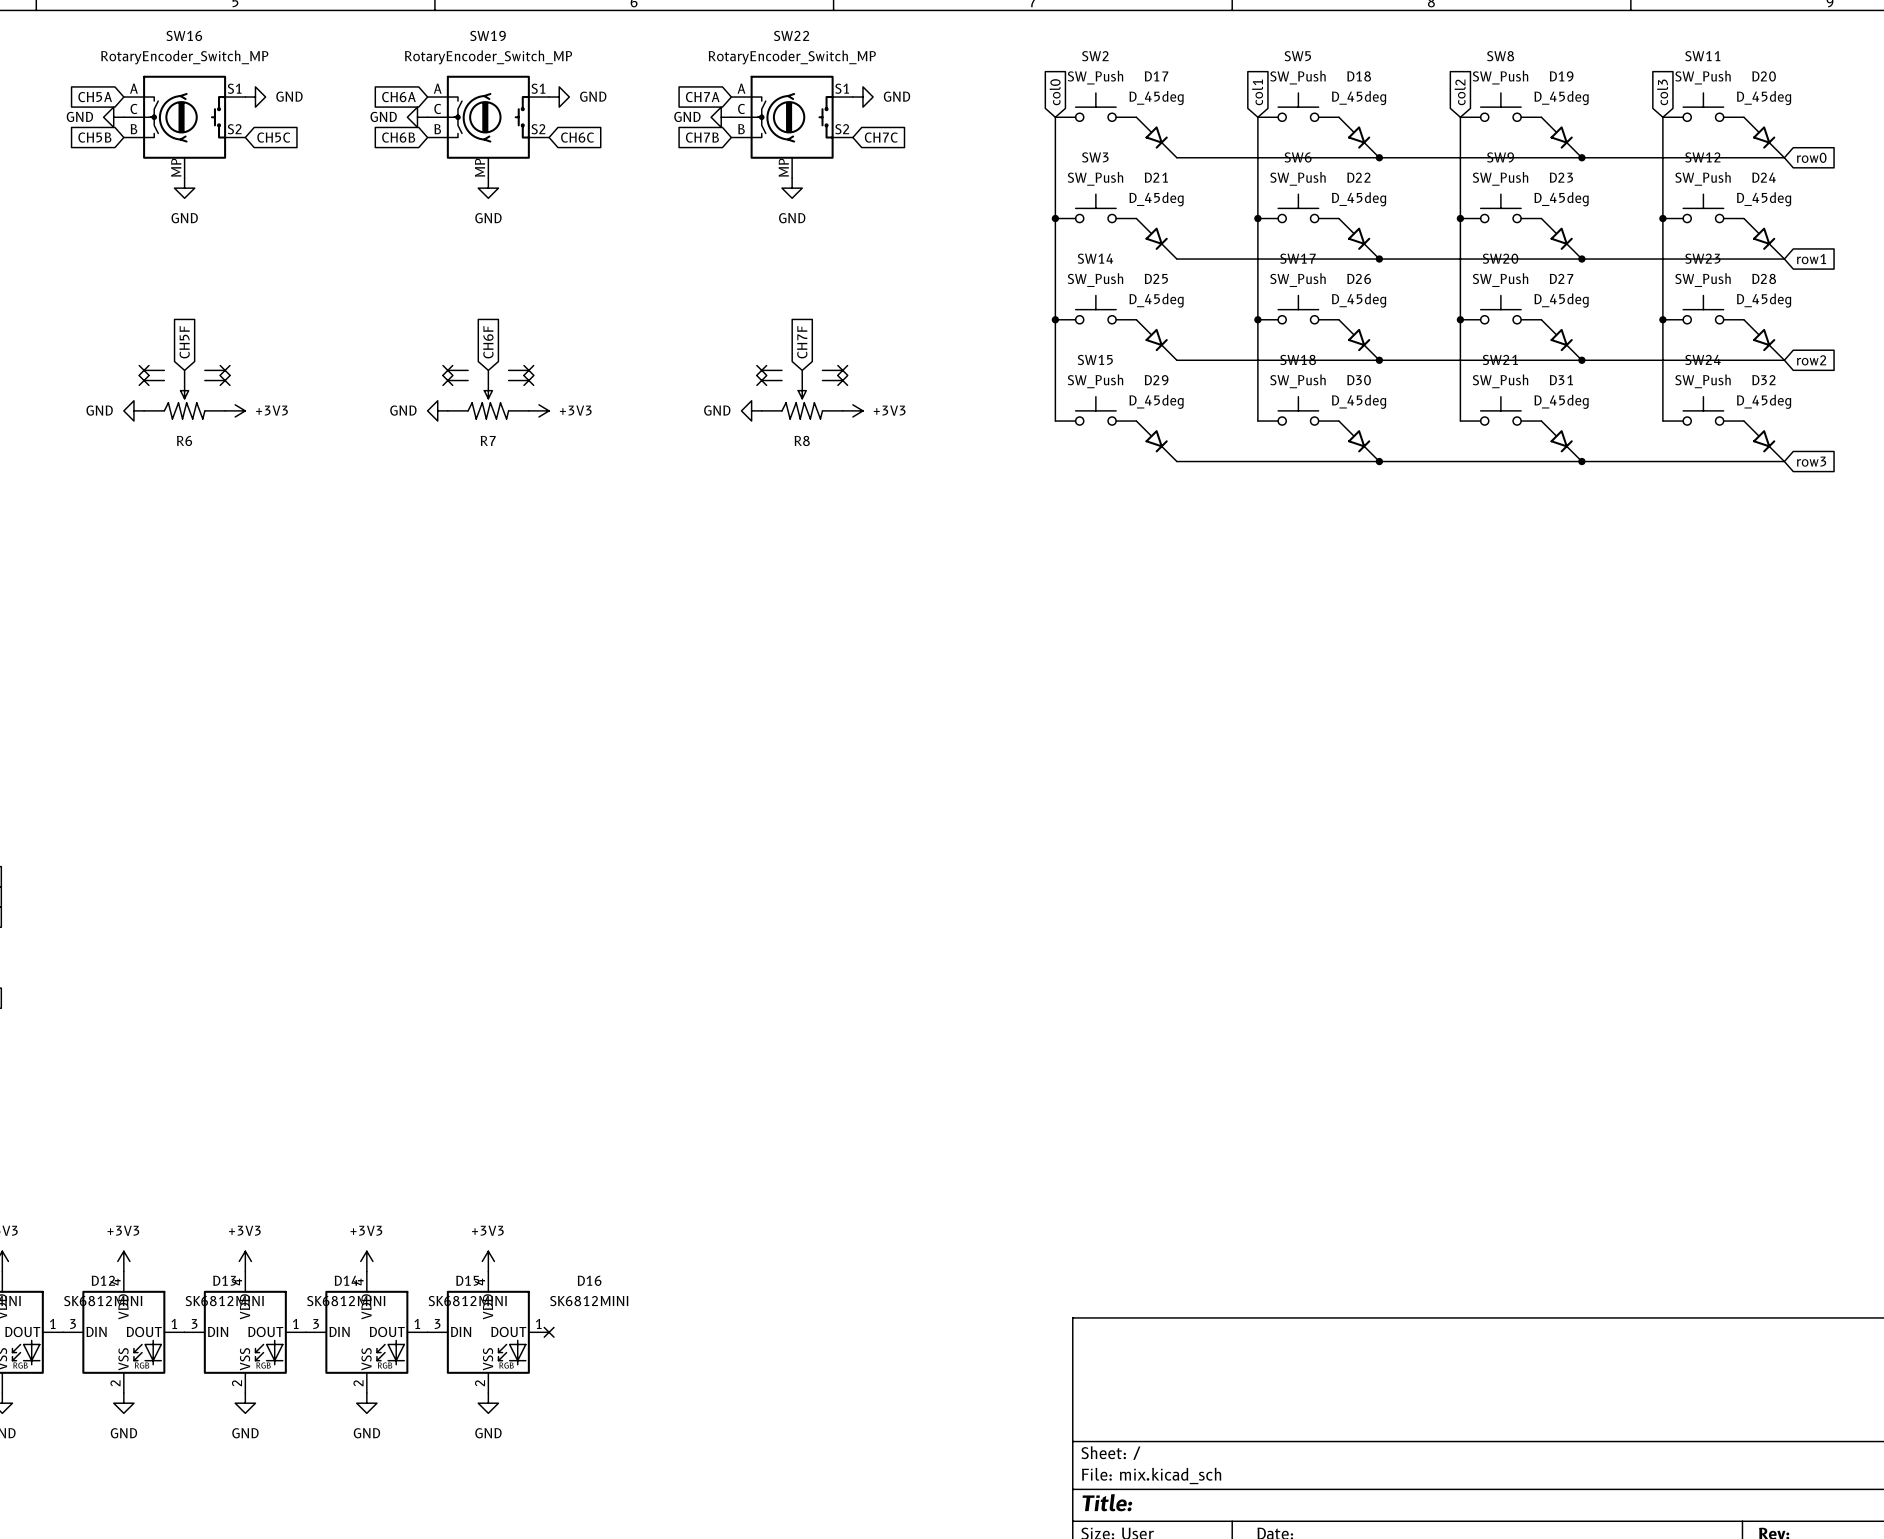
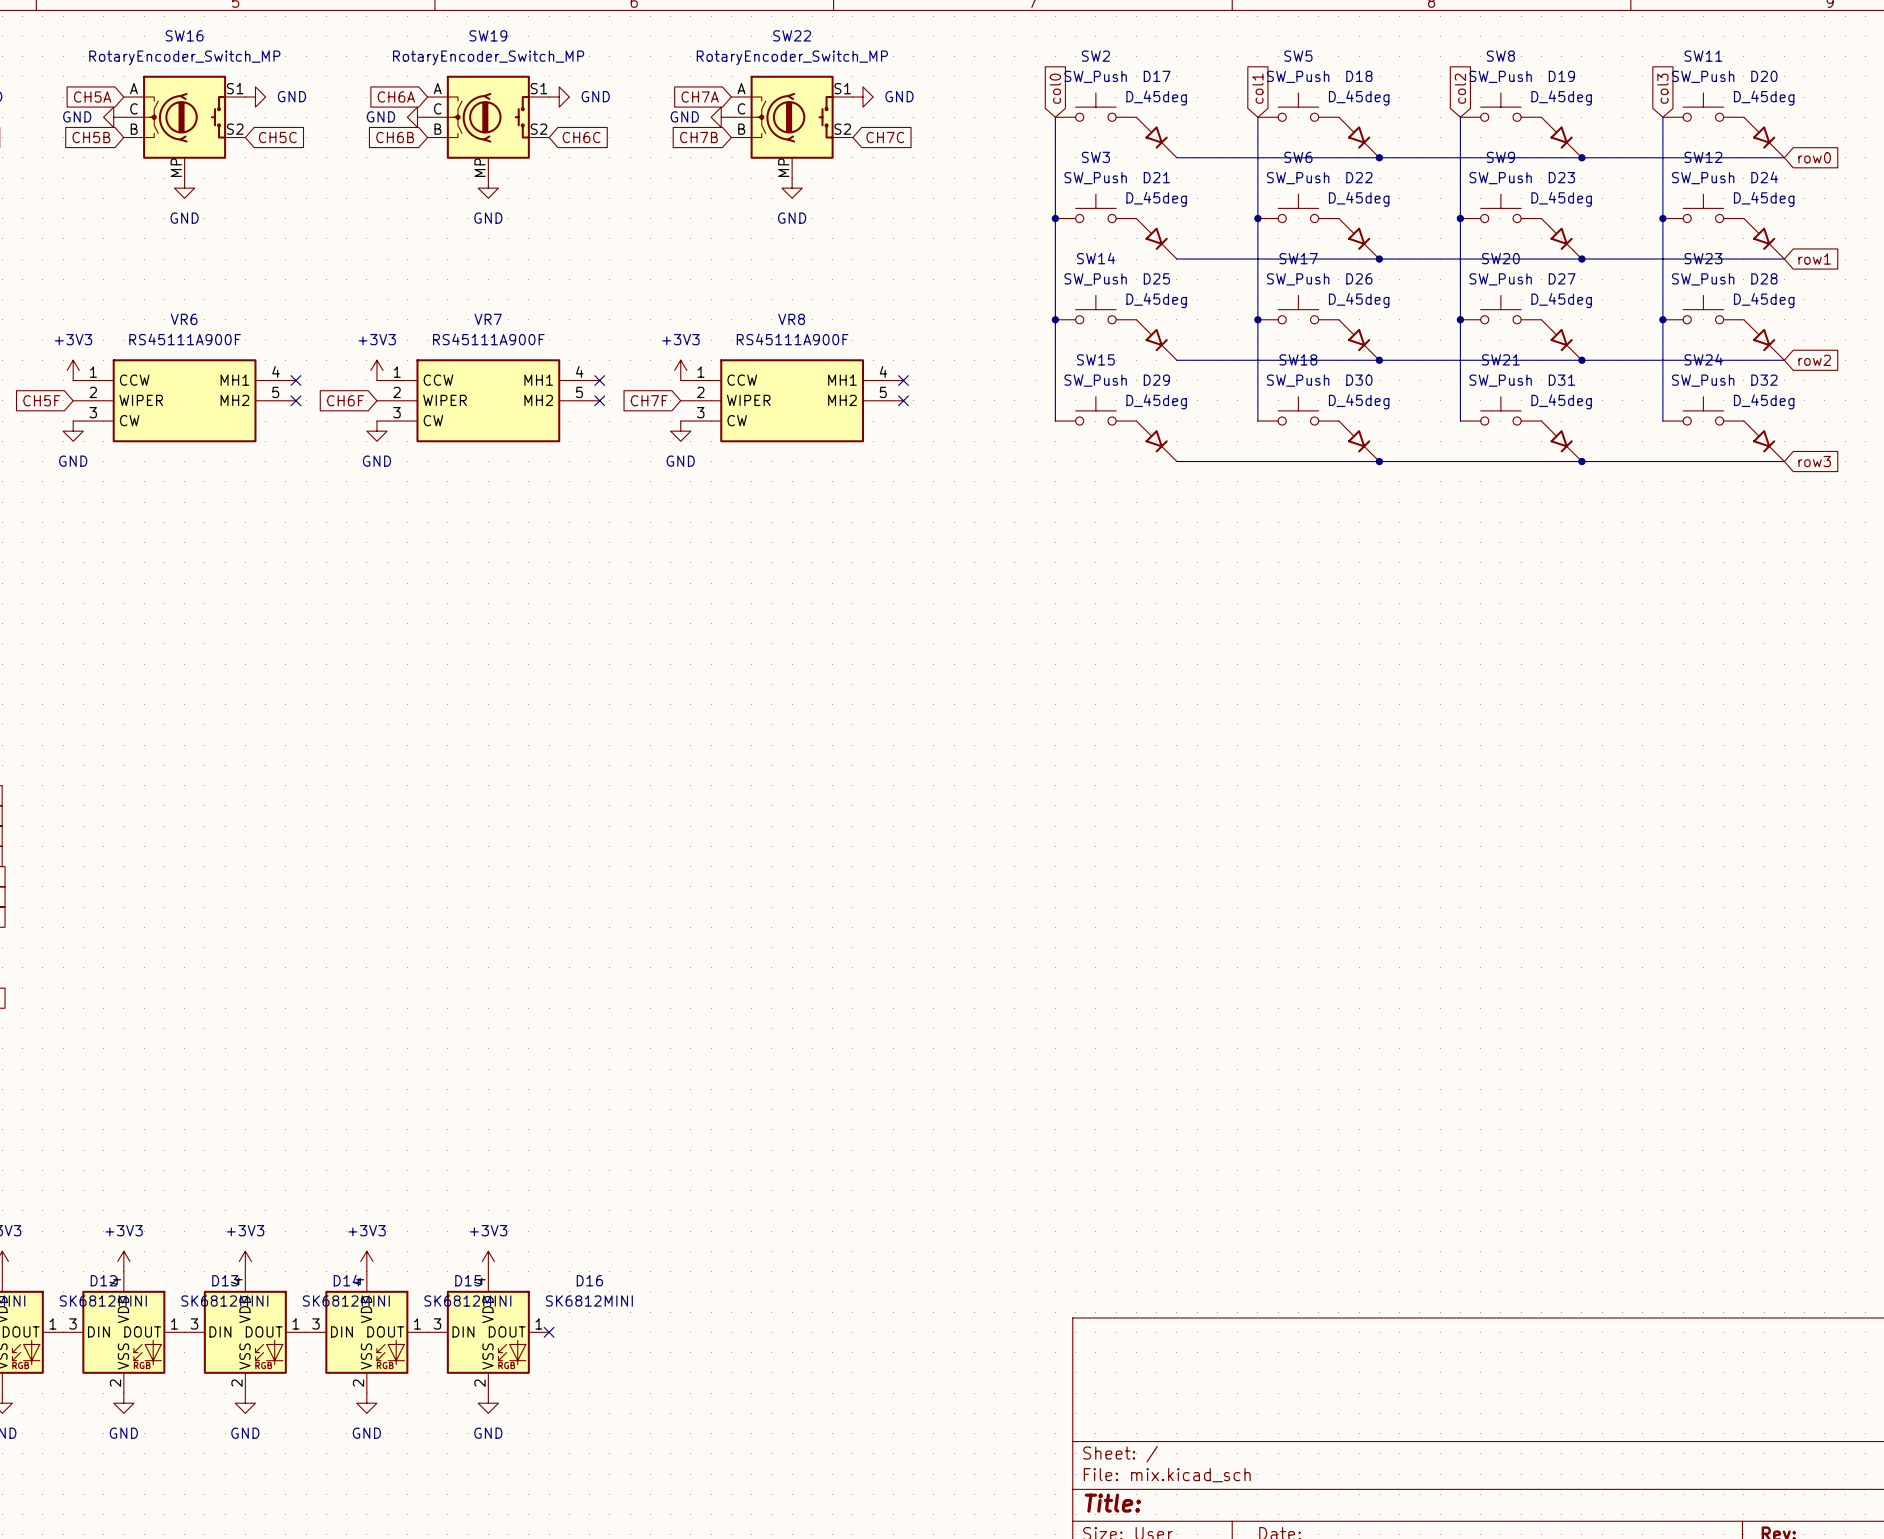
global label rotation: 0° (184, 342) -> 90° counterclockwise (41, 400)
global label position: CH5F (184, 342) -> CH5F (41, 400)
global label rotation: 0° (488, 342) -> 90° counterclockwise (345, 400)
global label position: CH6F (488, 342) -> CH6F (345, 400)
global label rotation: 0° (802, 342) -> 90° counterclockwise (649, 400)
global label position: CH7F (802, 342) -> CH7F (649, 400)
power symbol: none -> +3V3 (73, 370)
no-connect mark: (144, 370) -> none
no-connect mark: (225, 370) -> none
power symbol: none -> +3V3 (376, 370)
no-connect mark: (447, 370) -> none
no-connect mark: (528, 370) -> none
power symbol: none -> +3V3 (680, 370)
no-connect mark: (761, 370) -> none
no-connect mark: (842, 370) -> none
no-connect mark: (144, 380) -> none
no-connect mark: (225, 380) -> none
no-connect mark: none -> (295, 380)
no-connect mark: (447, 380) -> none
no-connect mark: (528, 380) -> none
no-connect mark: none -> (599, 380)
no-connect mark: (761, 380) -> none
no-connect mark: (842, 380) -> none
no-connect mark: none -> (903, 380)
R6: (184, 394) -> none
R7: (488, 394) -> none
R8: (802, 394) -> none
VR6: none -> RS45111A900F (184, 400)
no-connect mark: none -> (295, 400)
VR7: none -> RS45111A900F (488, 400)
no-connect mark: none -> (599, 400)
VR8: none -> RS45111A900F (792, 400)
no-connect mark: none -> (903, 400)
power symbol rotation: 0° (133, 410) -> 90° counterclockwise (73, 431)
power symbol position: GND (133, 410) -> GND (73, 431)
power symbol: +3V3 (235, 410) -> none
power symbol rotation: 0° (437, 410) -> 90° counterclockwise (376, 431)
power symbol position: GND (437, 410) -> GND (376, 431)
power symbol: +3V3 (538, 410) -> none
power symbol rotation: 0° (751, 410) -> 90° counterclockwise (680, 431)
power symbol position: GND (751, 410) -> GND (680, 431)
power symbol: +3V3 (852, 410) -> none

